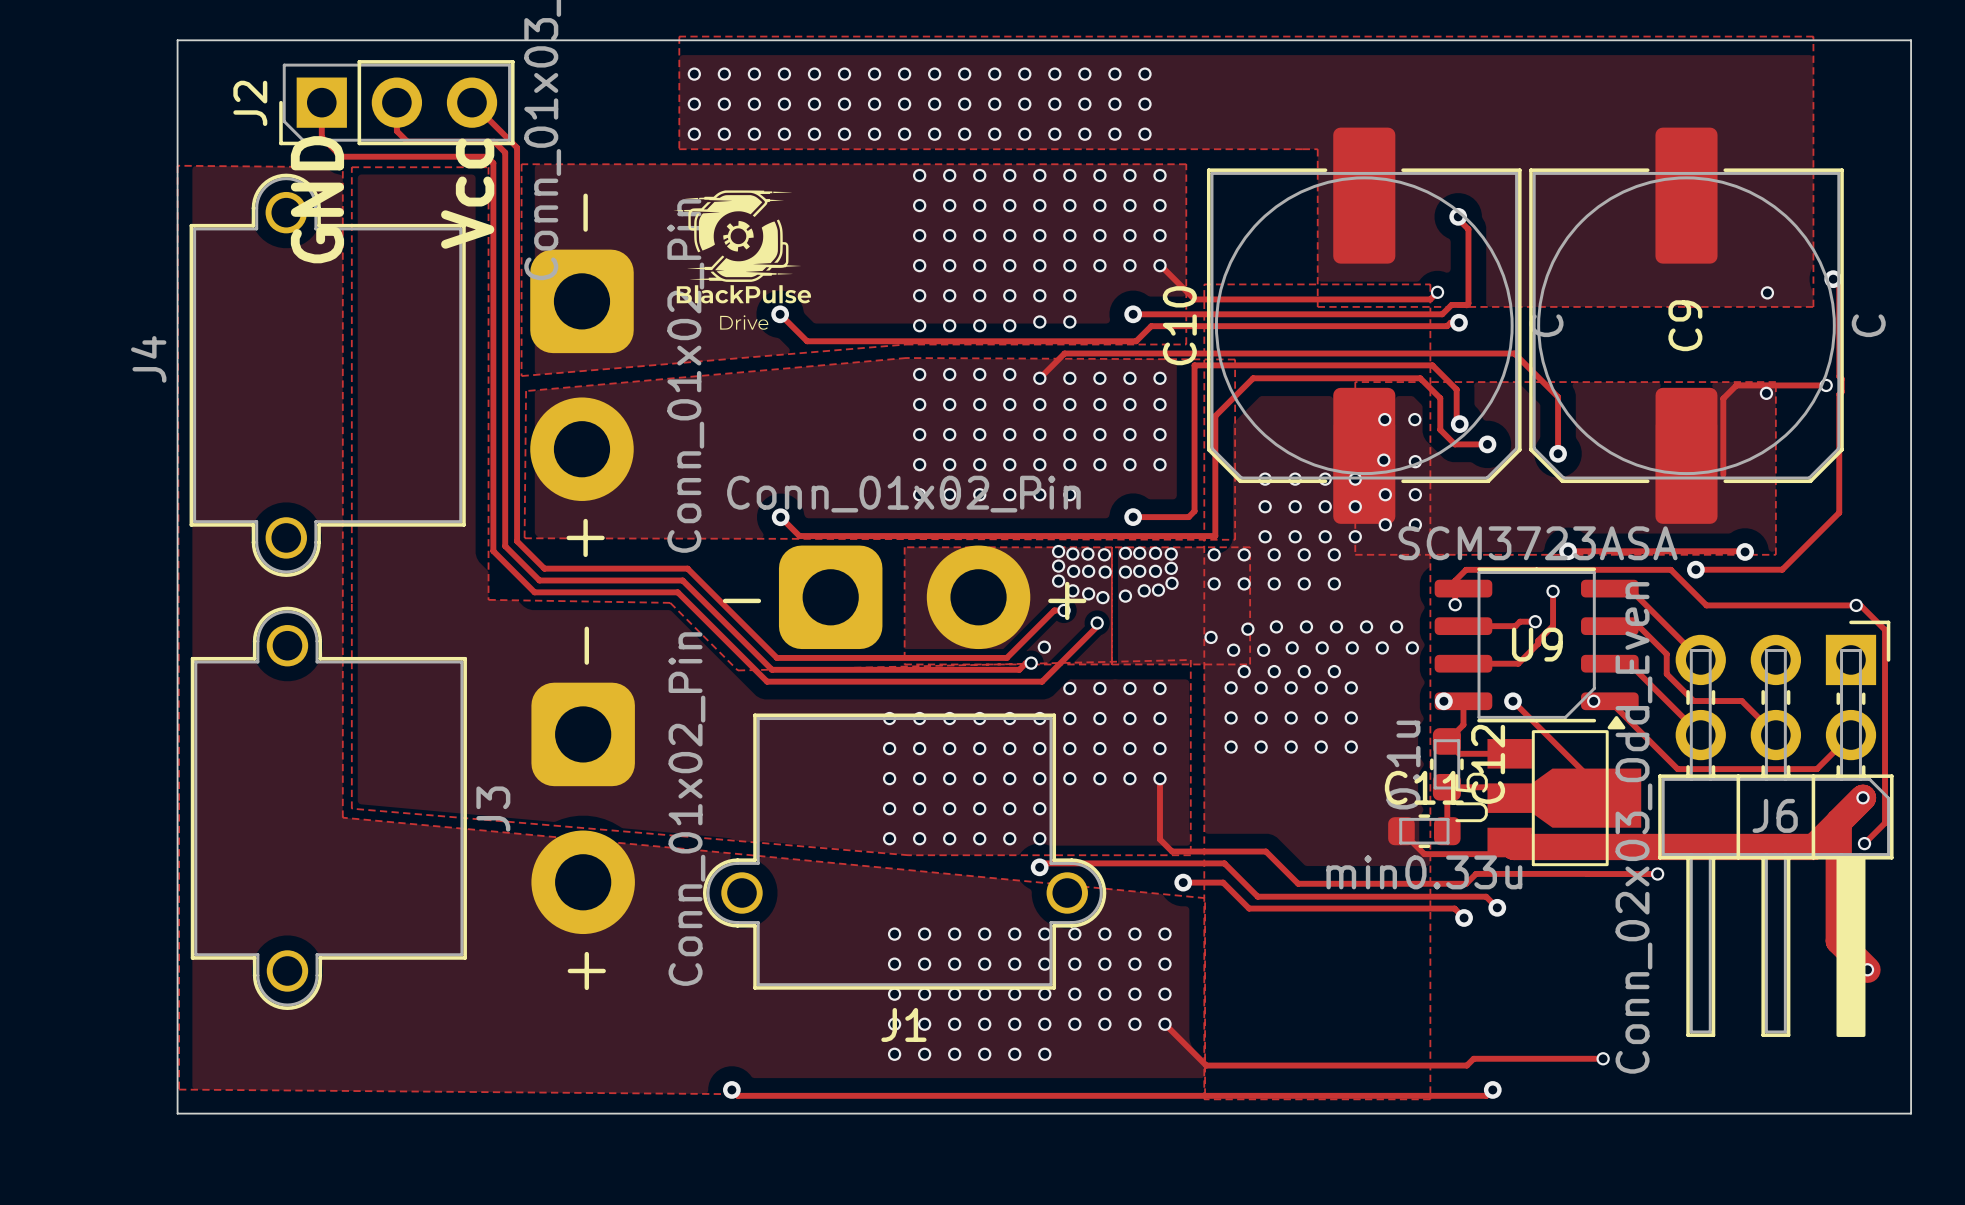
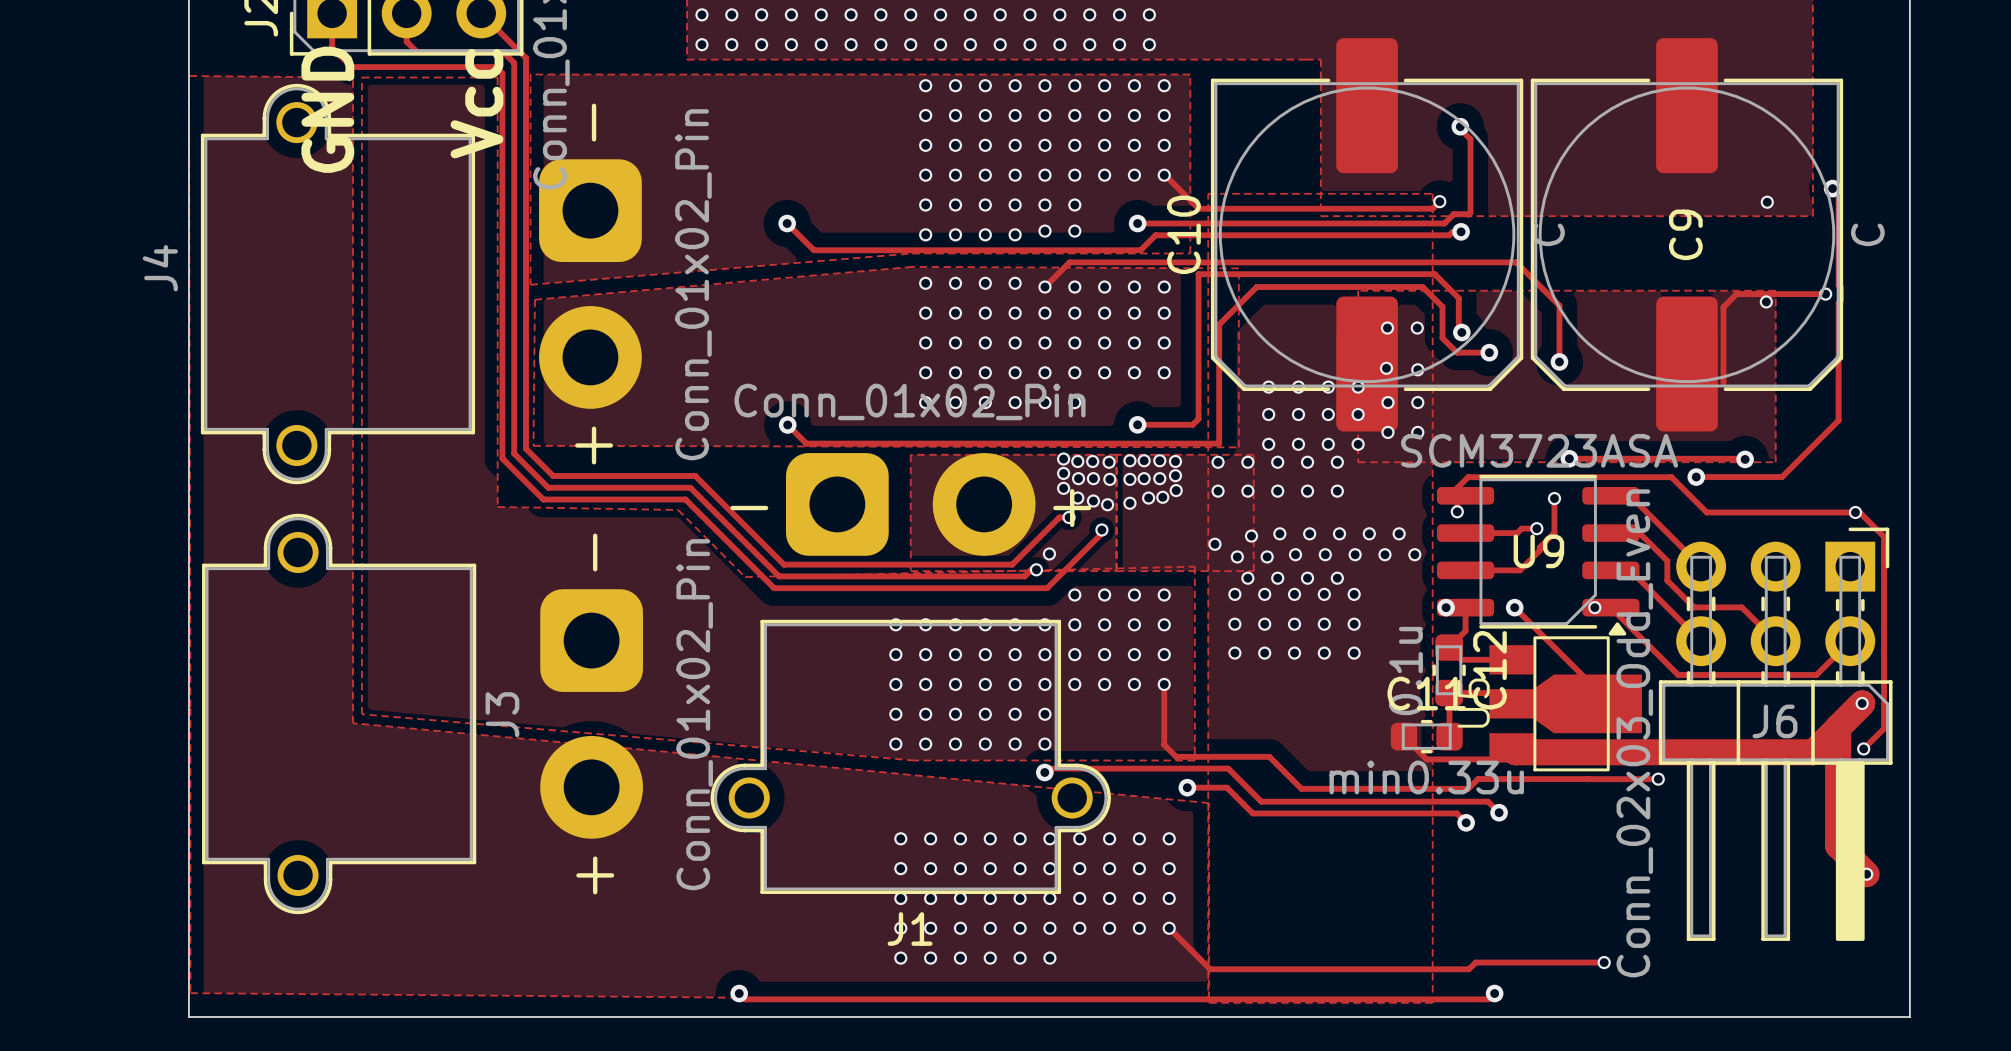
drawing: [673, 190, 812, 330] -> none

